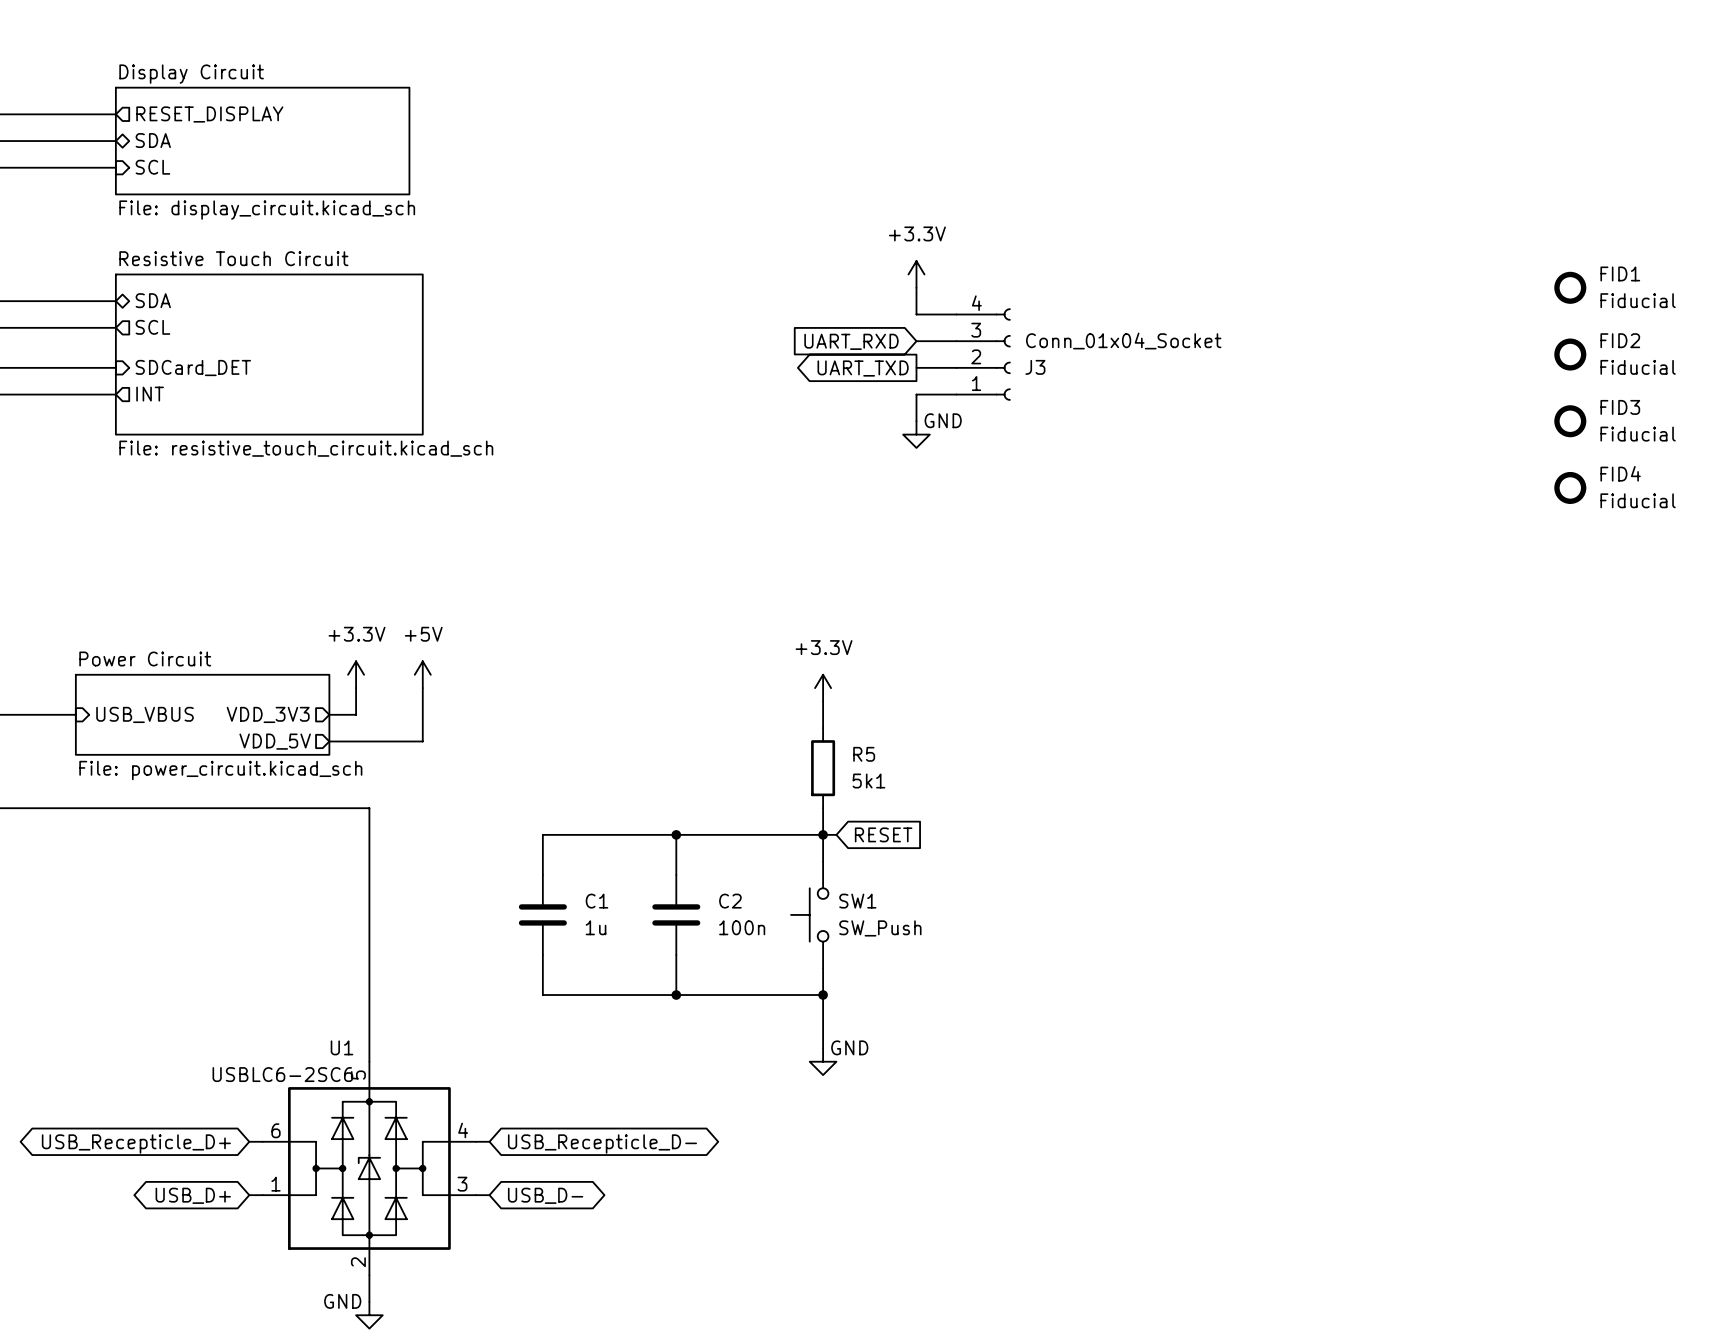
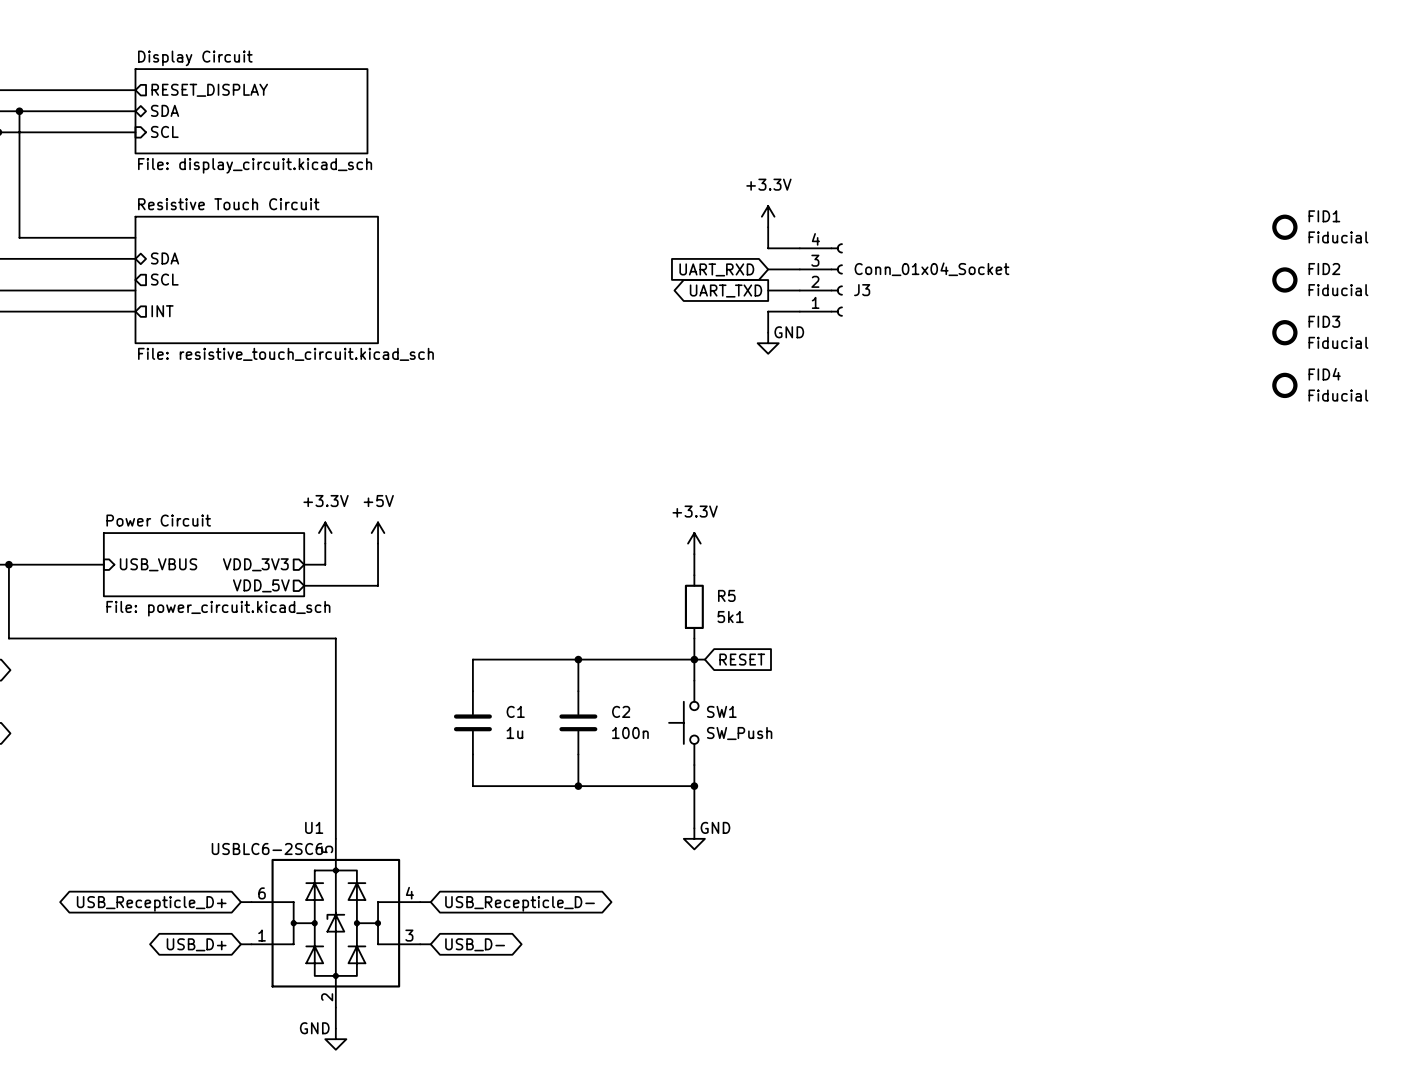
sheet pin: SDA (153, 300) -> none
sheet pin shape: output (152, 327) -> bidirectional (165, 258)
sheet pin: SCL (152, 327) -> SDA (165, 258)
sheet pin: none -> SCL (164, 279)
sheet pin: SDCard_DET (193, 368) -> none

